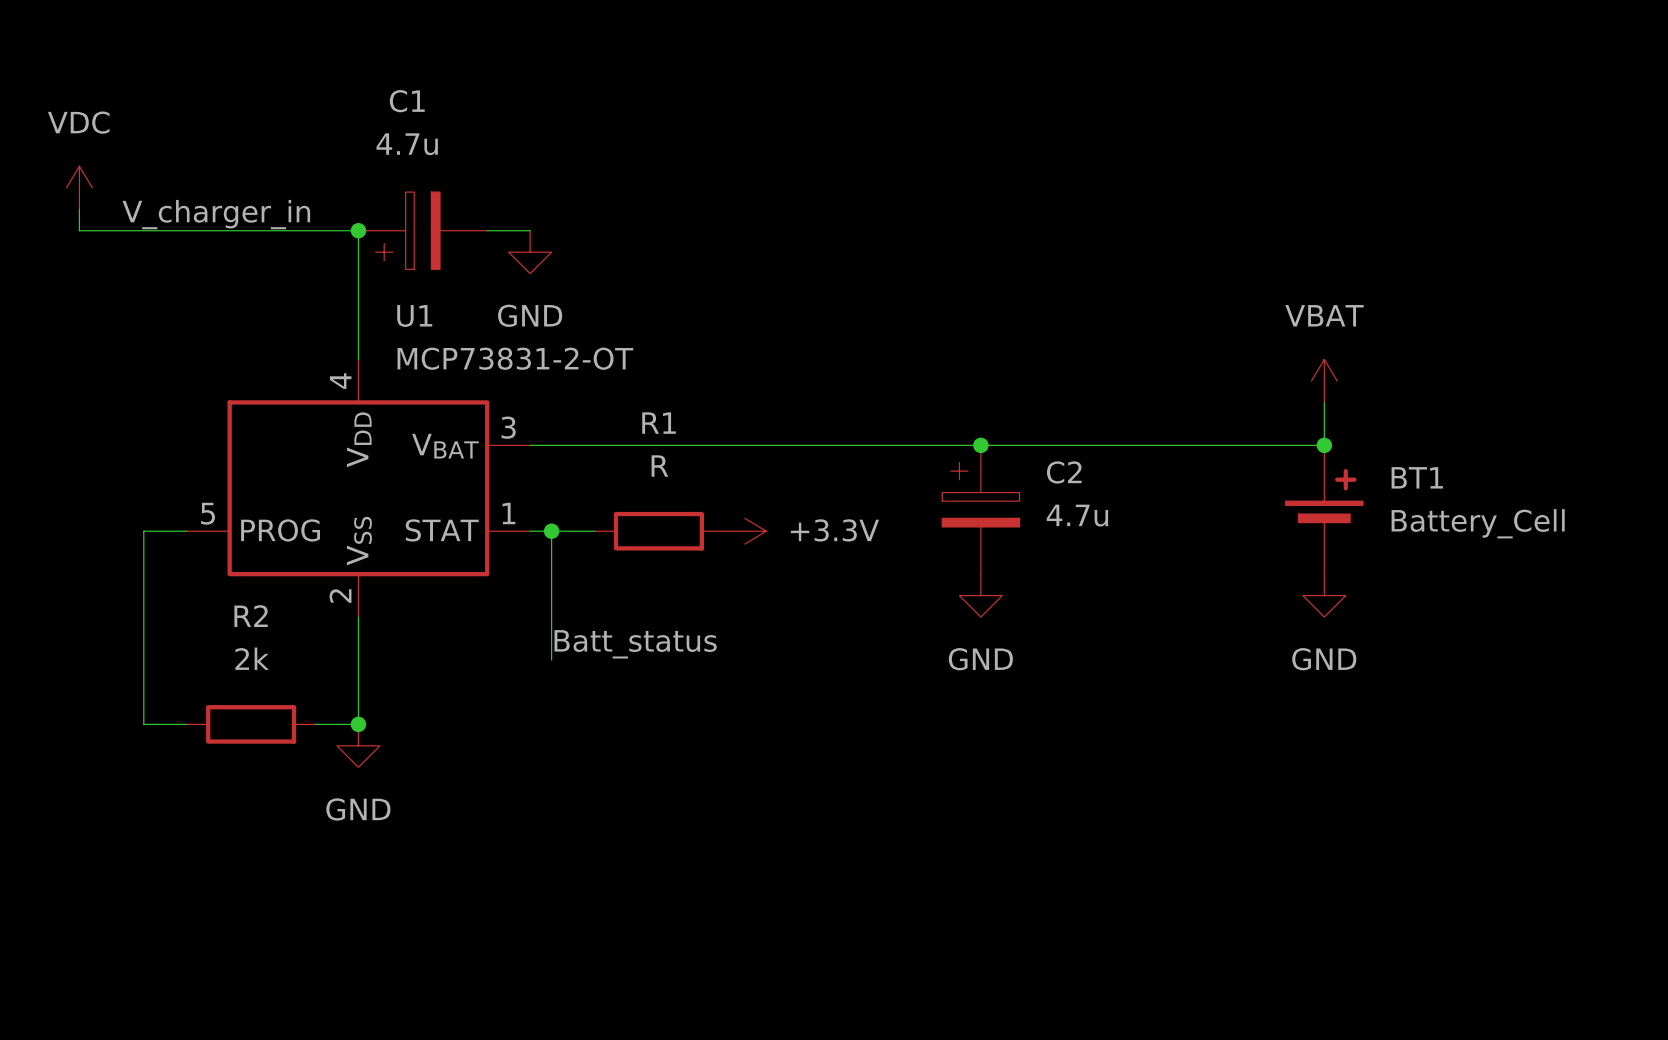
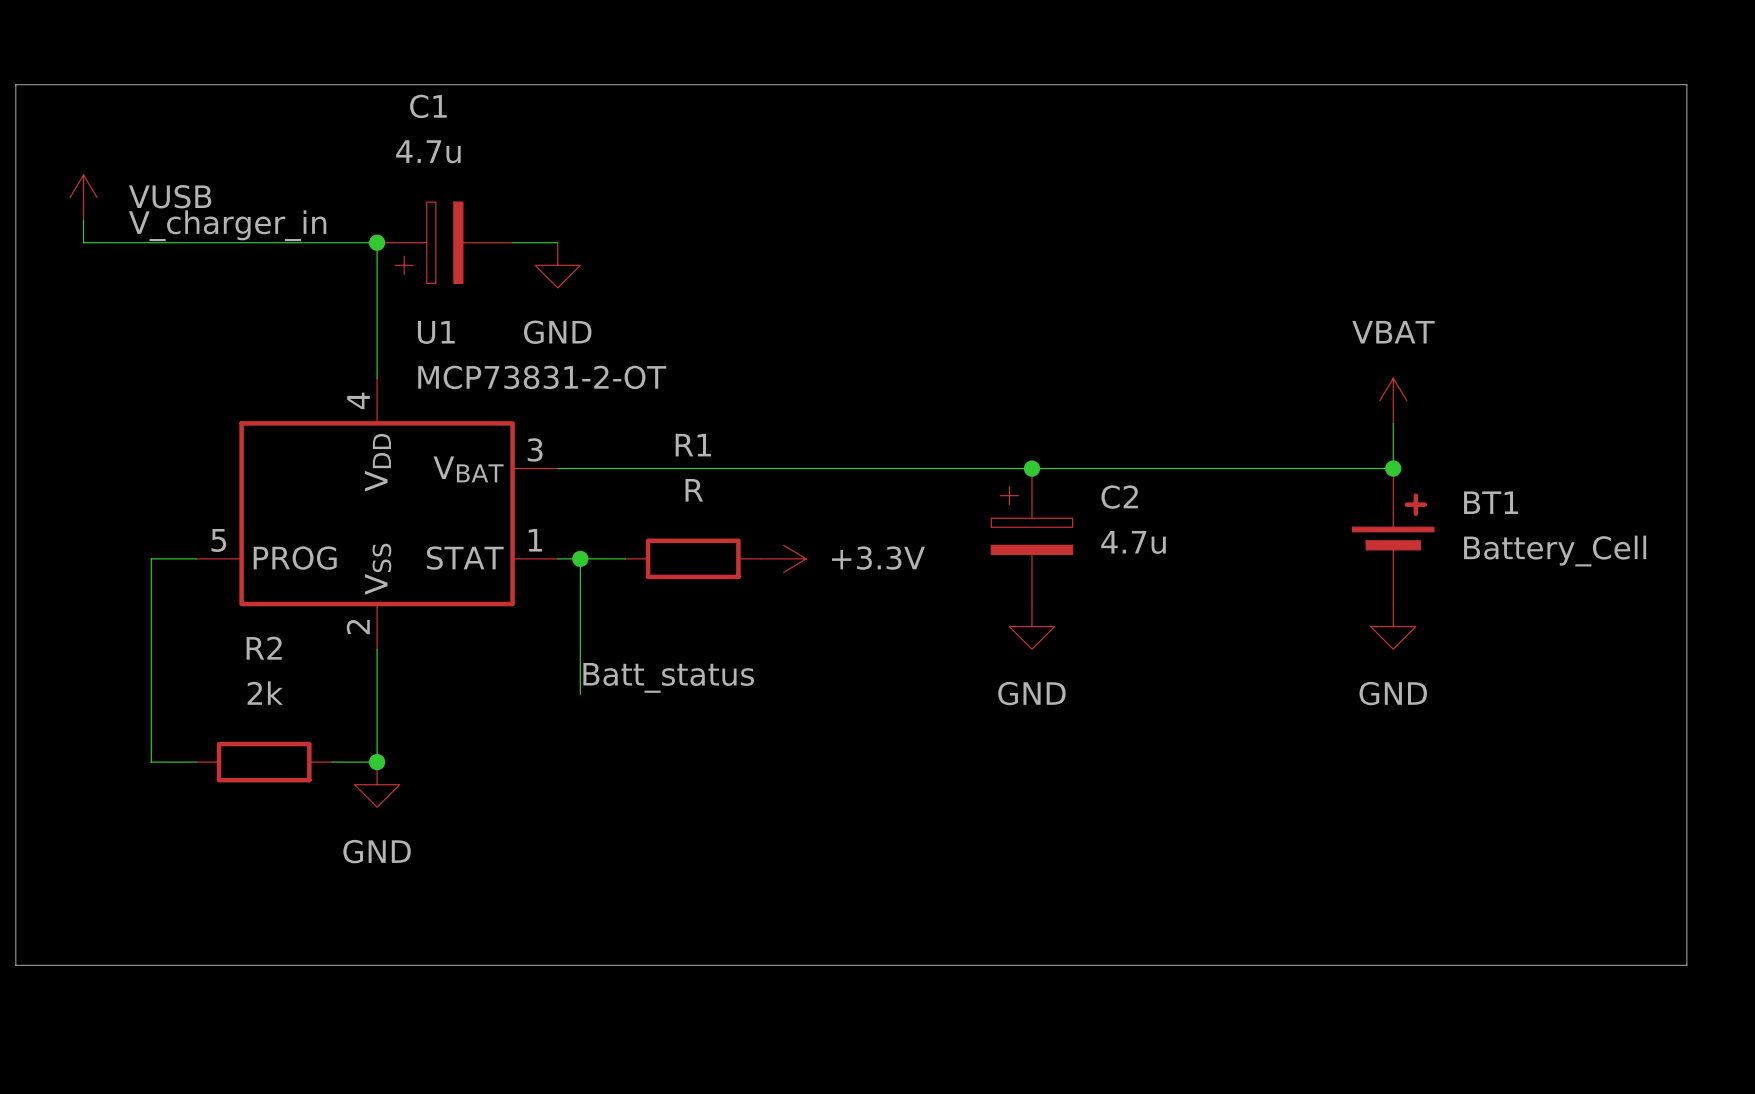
line: none -> (15, 84) (1686, 84) (1686, 965) (15, 965) (15, 84)
power symbol: VDC (79, 187) -> VUSB (83, 197)

